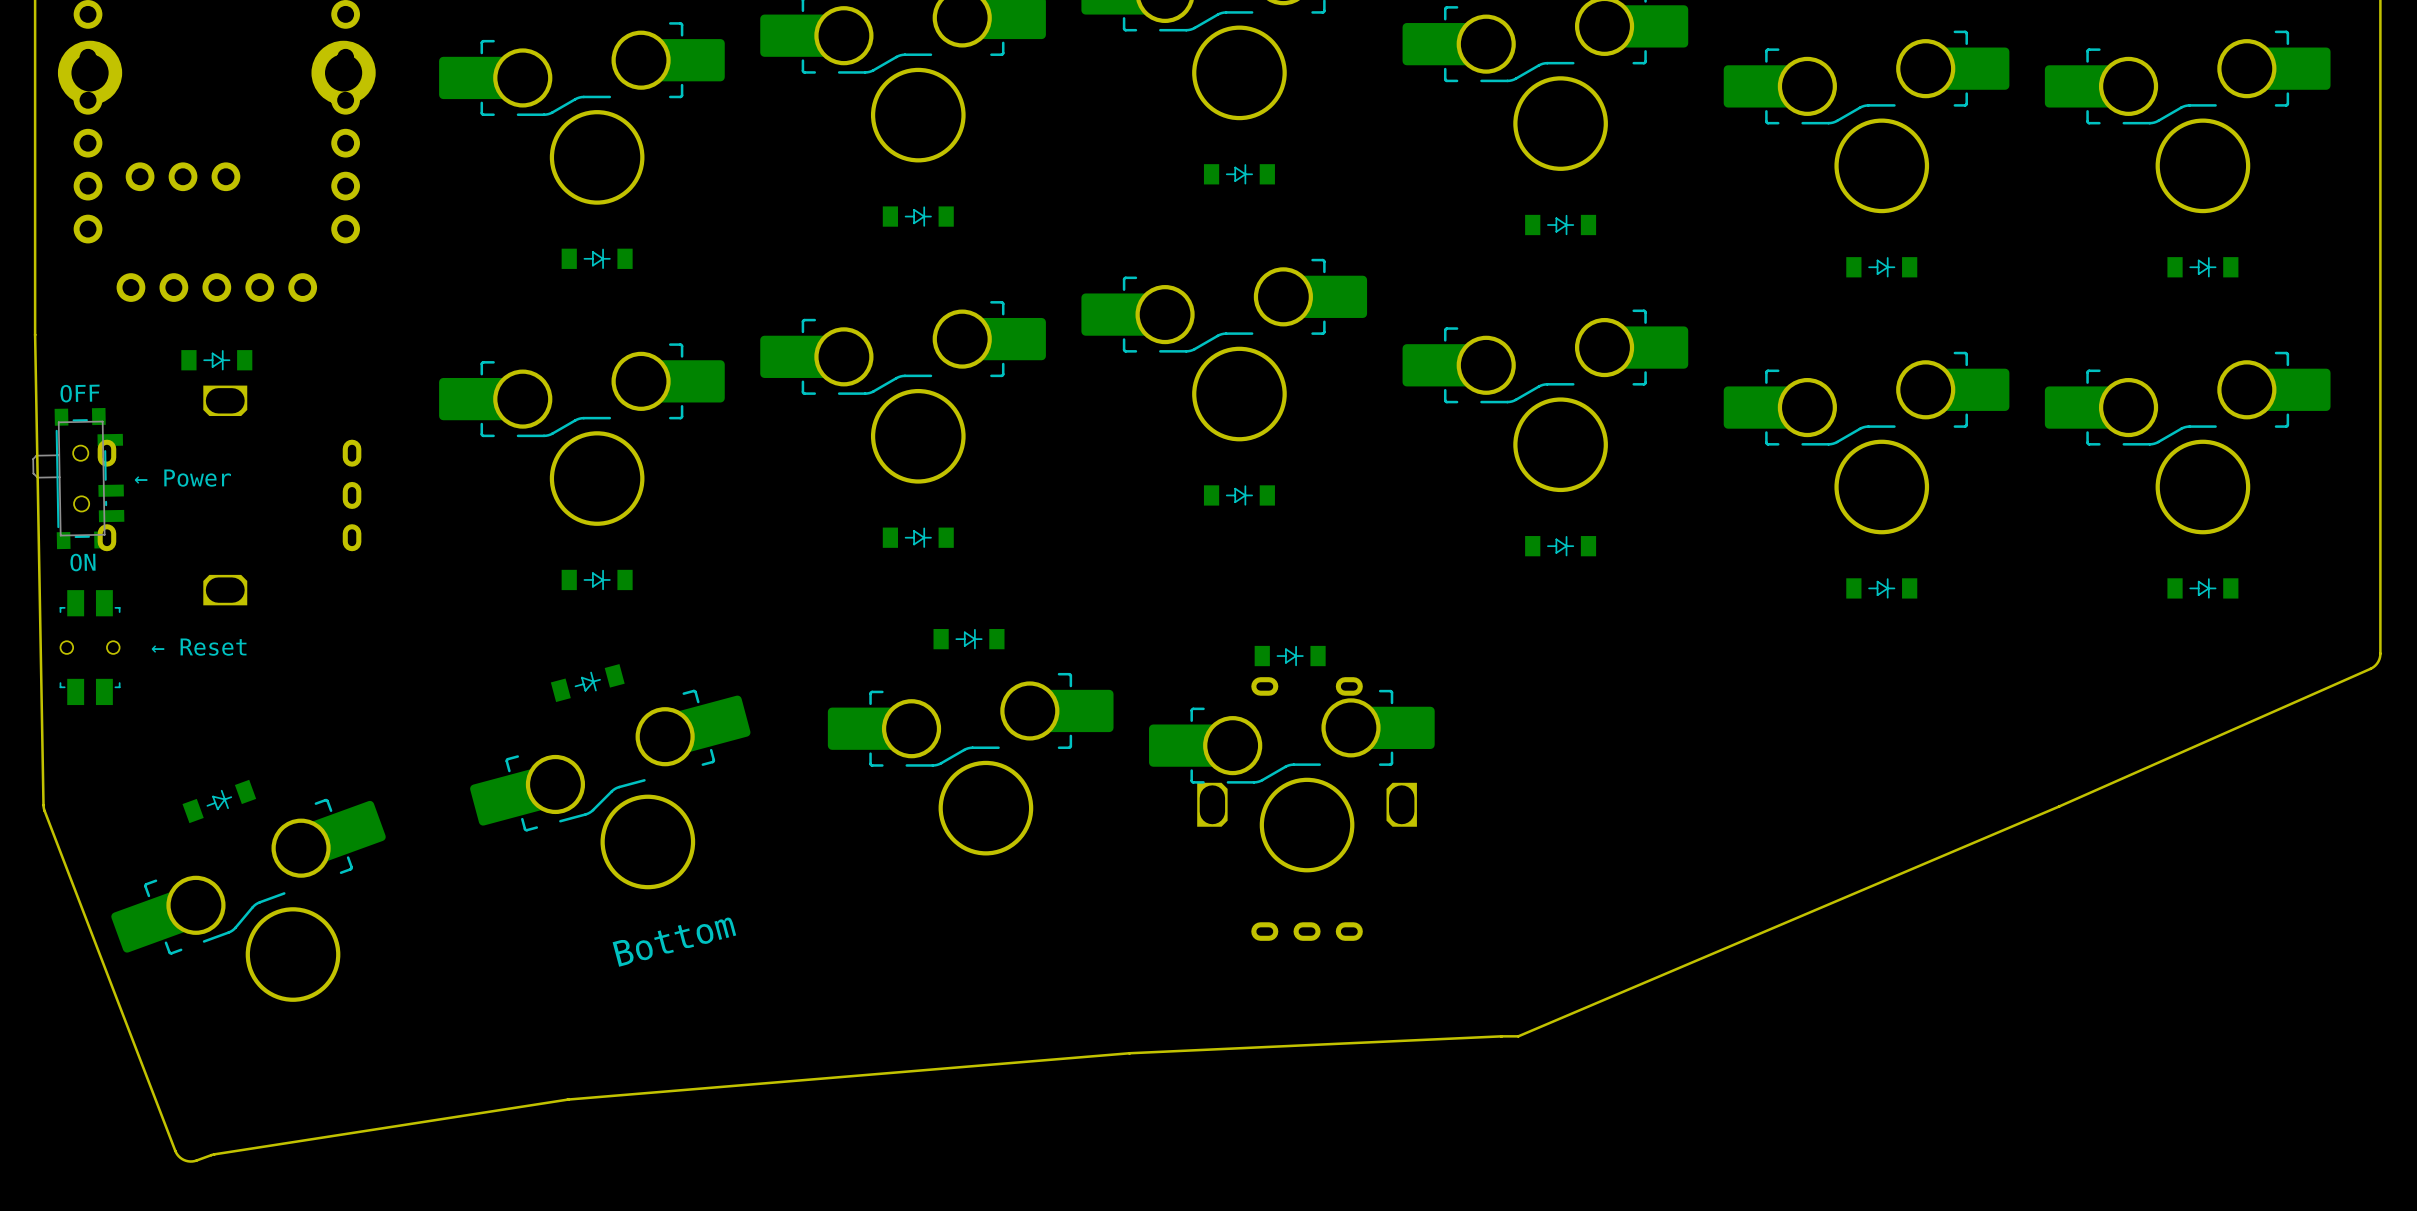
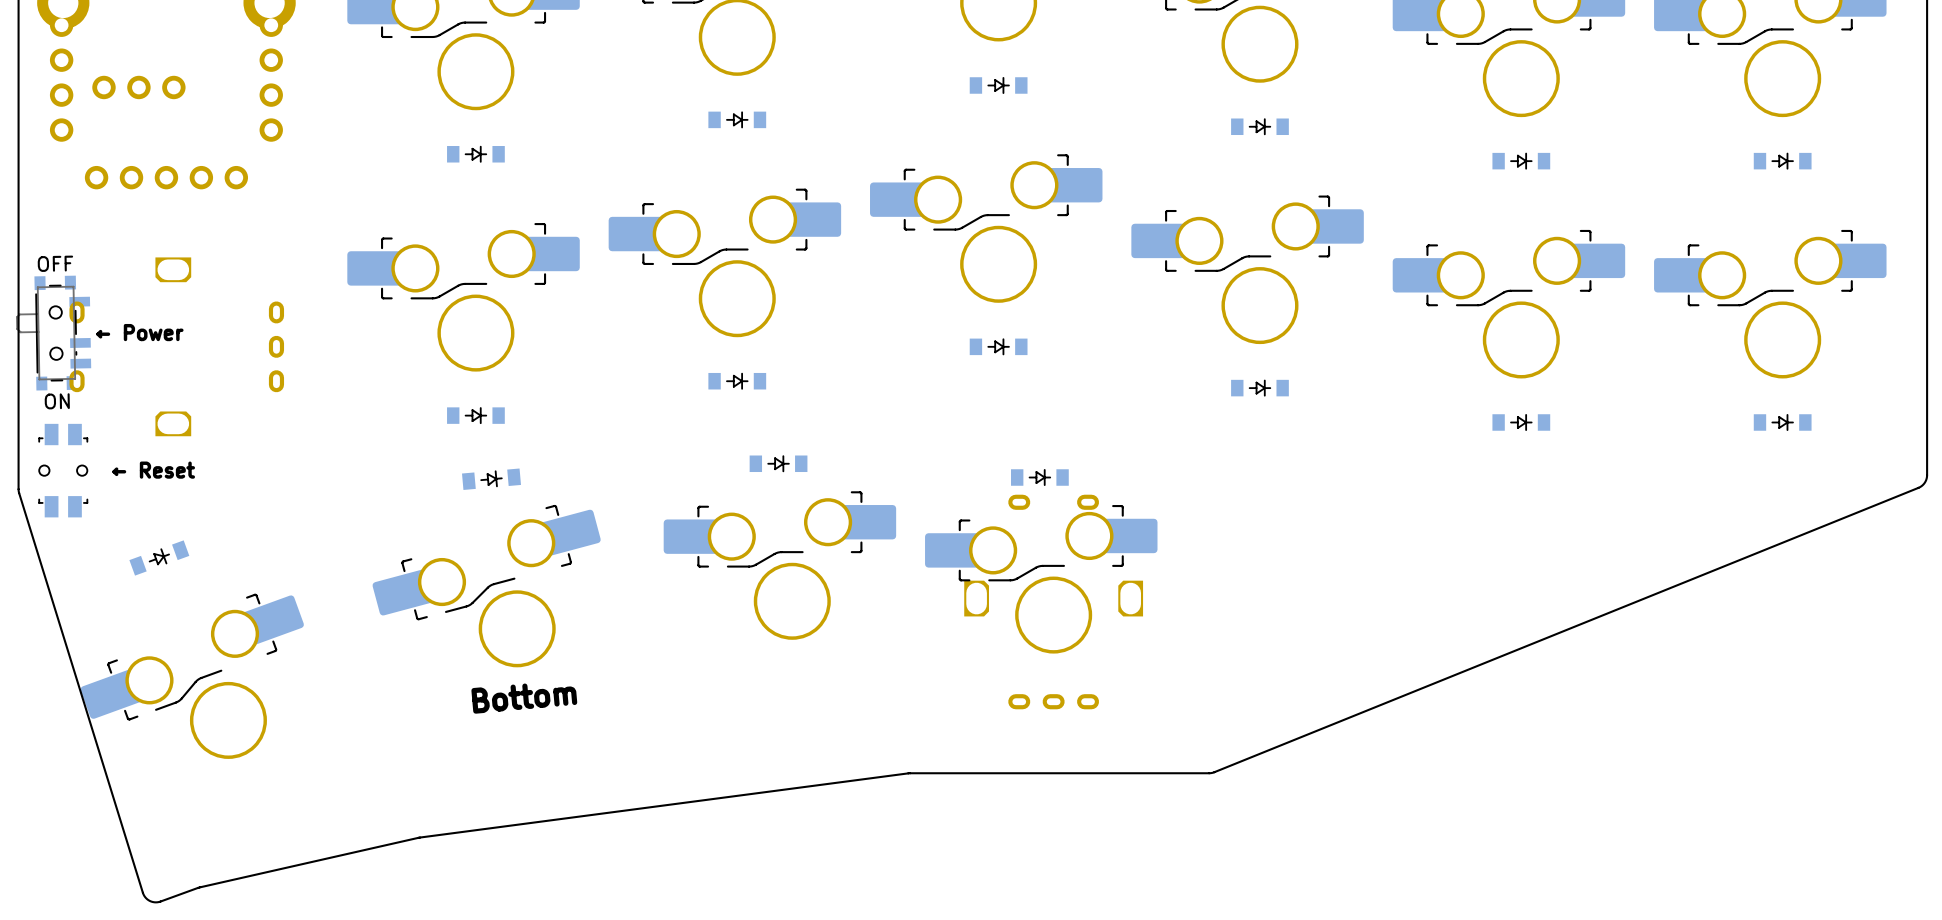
board edge: (35, 334) (43, 808) (175, 1150) (180, 1157) (188, 1161) (214, 1154) (568, 1099) (1129, 1053) (1518, 1036) (2059, 806) (2370, 668) (2377, 662) (2380, 653) -> (18, 216) (18, 492) (142, 892) (147, 899) (154, 902) (199, 887) (419, 837) (908, 773) (1211, 772) (1918, 487) (1924, 482) (1927, 475)
part: (216, 360) -> none
part: none -> (491, 479)
part: (587, 683) -> none
part position: (219, 801) -> (159, 557)
text rotation: 0° (674, 941) -> 10° clockwise (524, 698)

